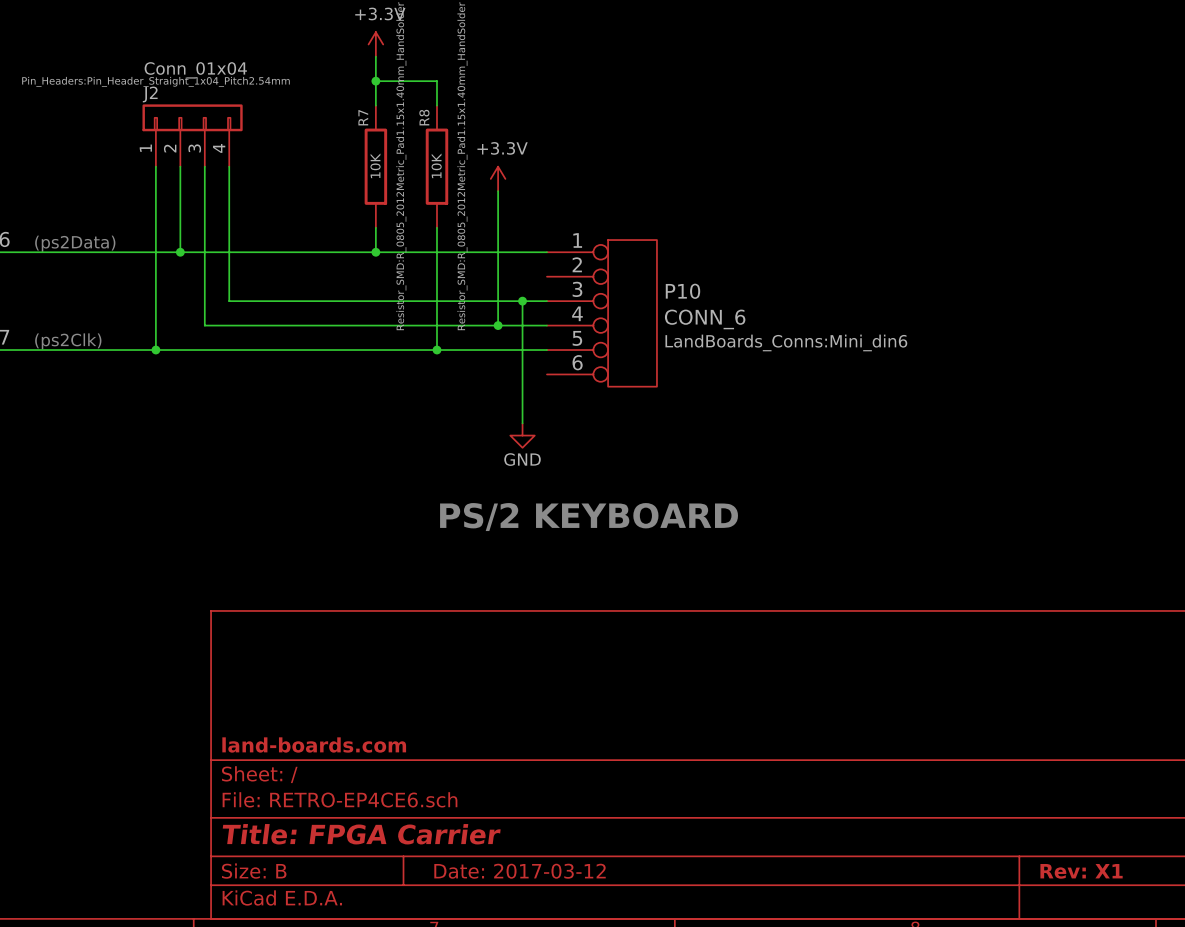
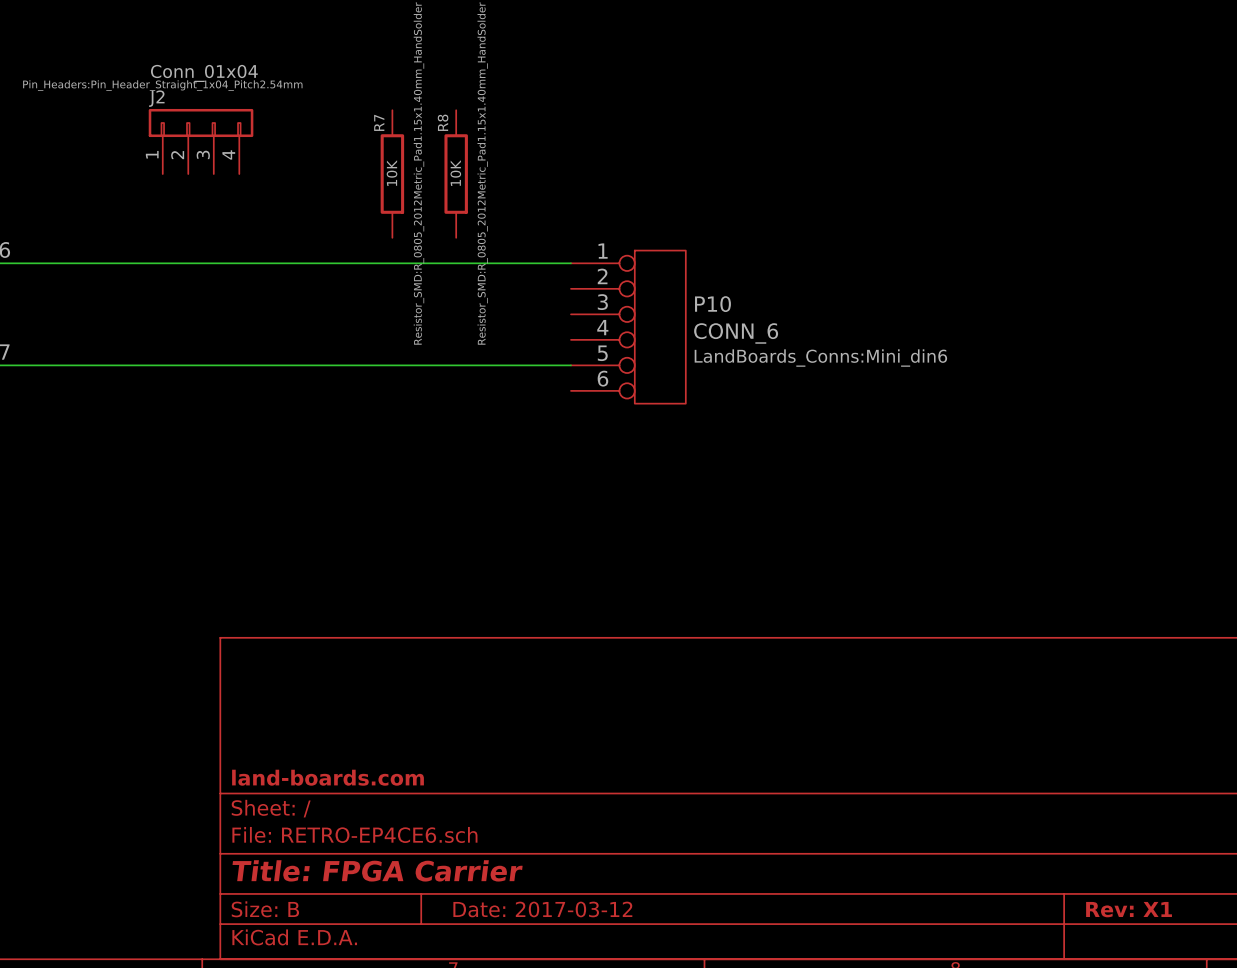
power symbol: +3.3V (375, 44) -> none
wire: (375, 56) (375, 105) -> none
wire: (375, 81) (436, 81) (436, 105) -> none
junction: (375, 81) -> none
wire: (155, 166) (155, 350) -> none
wire: (180, 166) (180, 252) -> none
wire: (204, 166) (204, 325) (546, 325) -> none
wire: (229, 166) (229, 301) (546, 301) -> none
power symbol: +3.3V (498, 178) -> none
wire: (498, 191) (498, 325) -> none
wire: (375, 227) (375, 252) -> none
wire: (436, 227) (436, 350) -> none
text: (ps2Data) (75, 243) -> none
junction: (180, 252) -> none
junction: (375, 252) -> none
wire: (522, 301) (522, 423) -> none
junction: (522, 301) -> none
junction: (498, 325) -> none
text: (ps2Clk) (68, 341) -> none
junction: (155, 350) -> none
junction: (436, 350) -> none
power symbol: GND (522, 435) -> none
text: PS/2 KEYBOARD (589, 517) -> none

